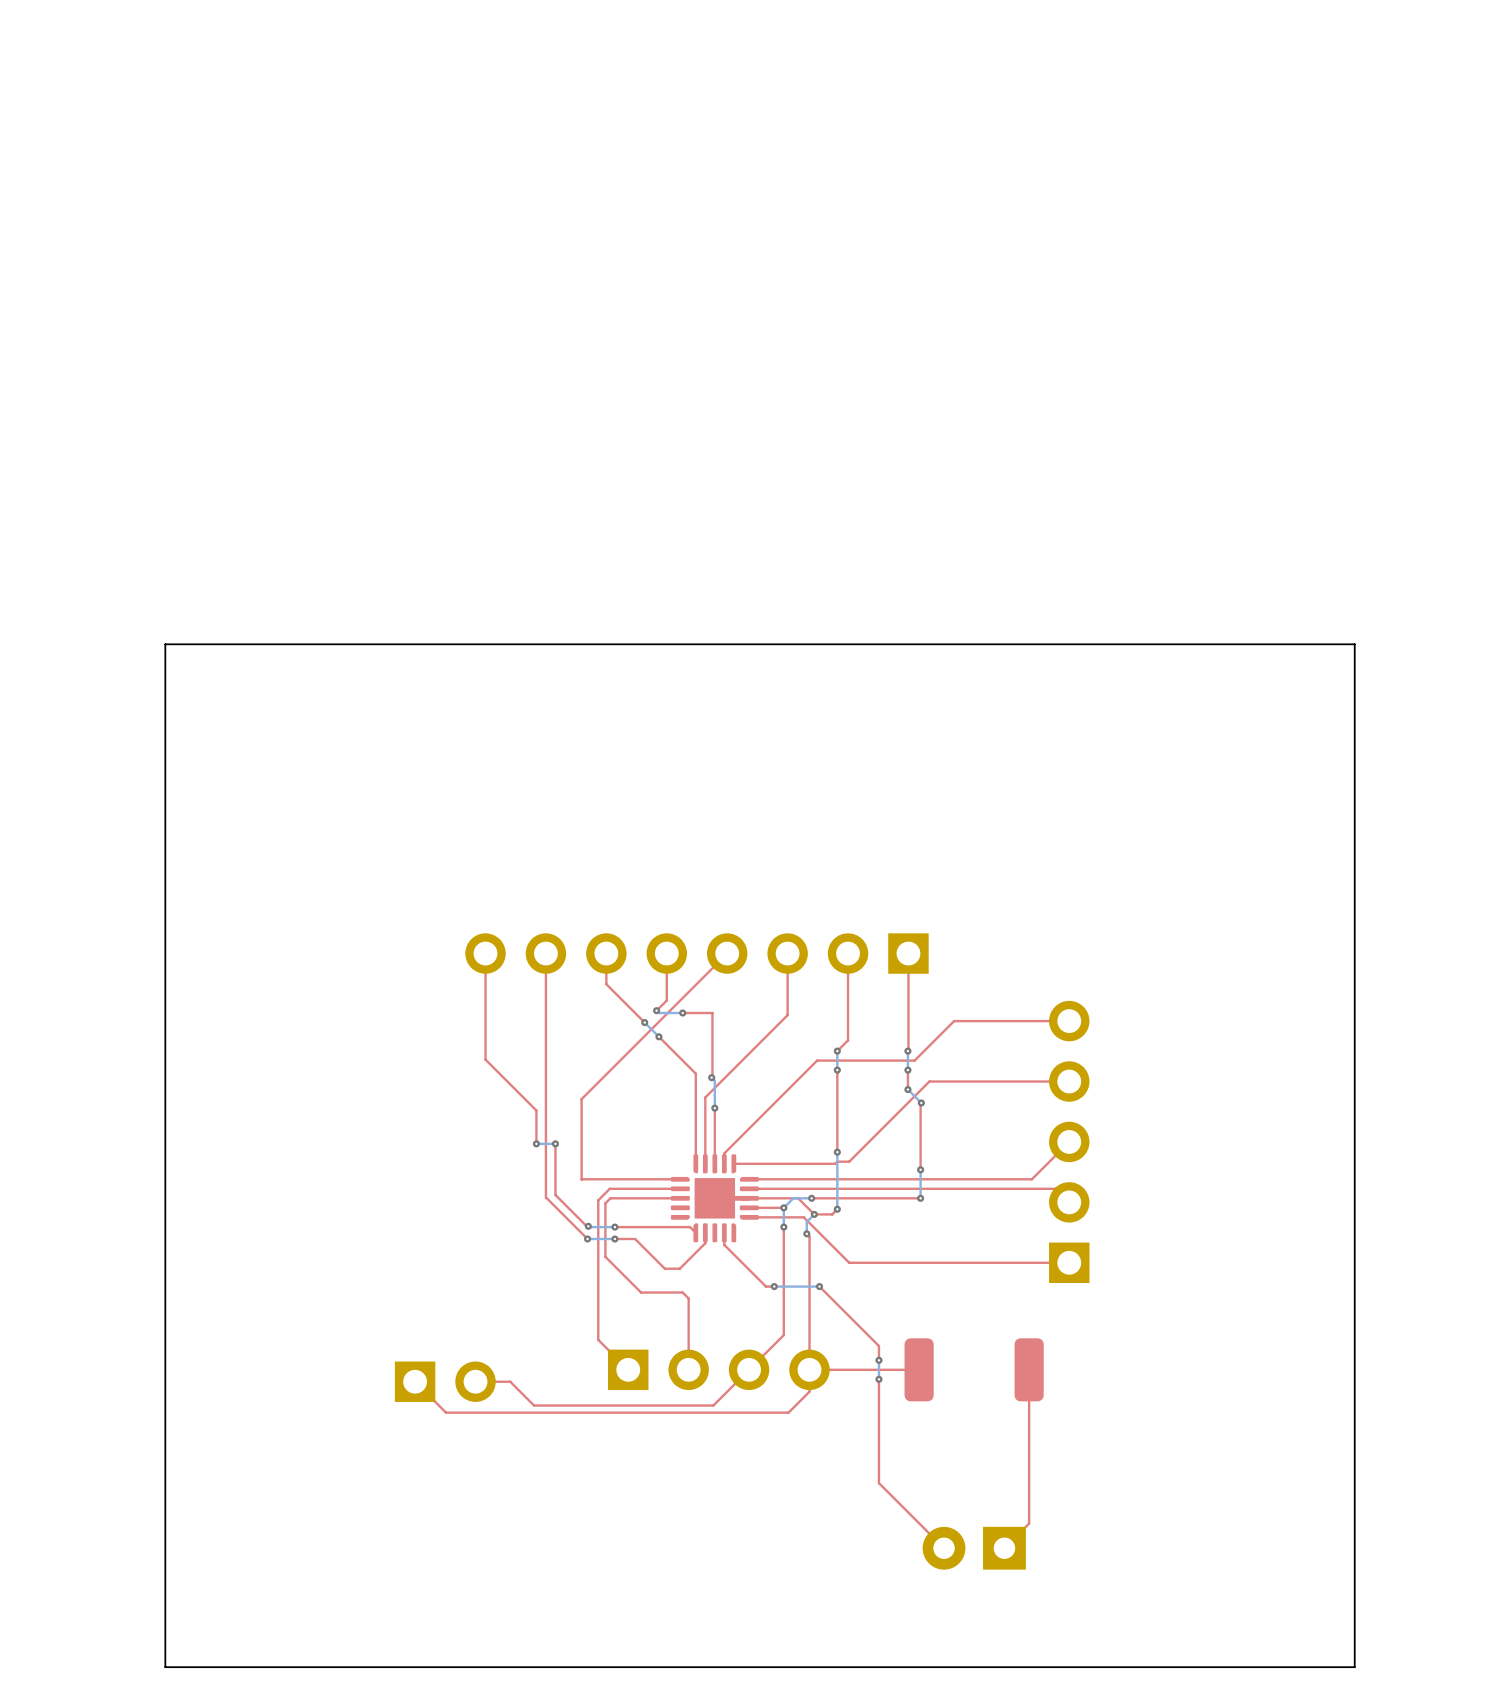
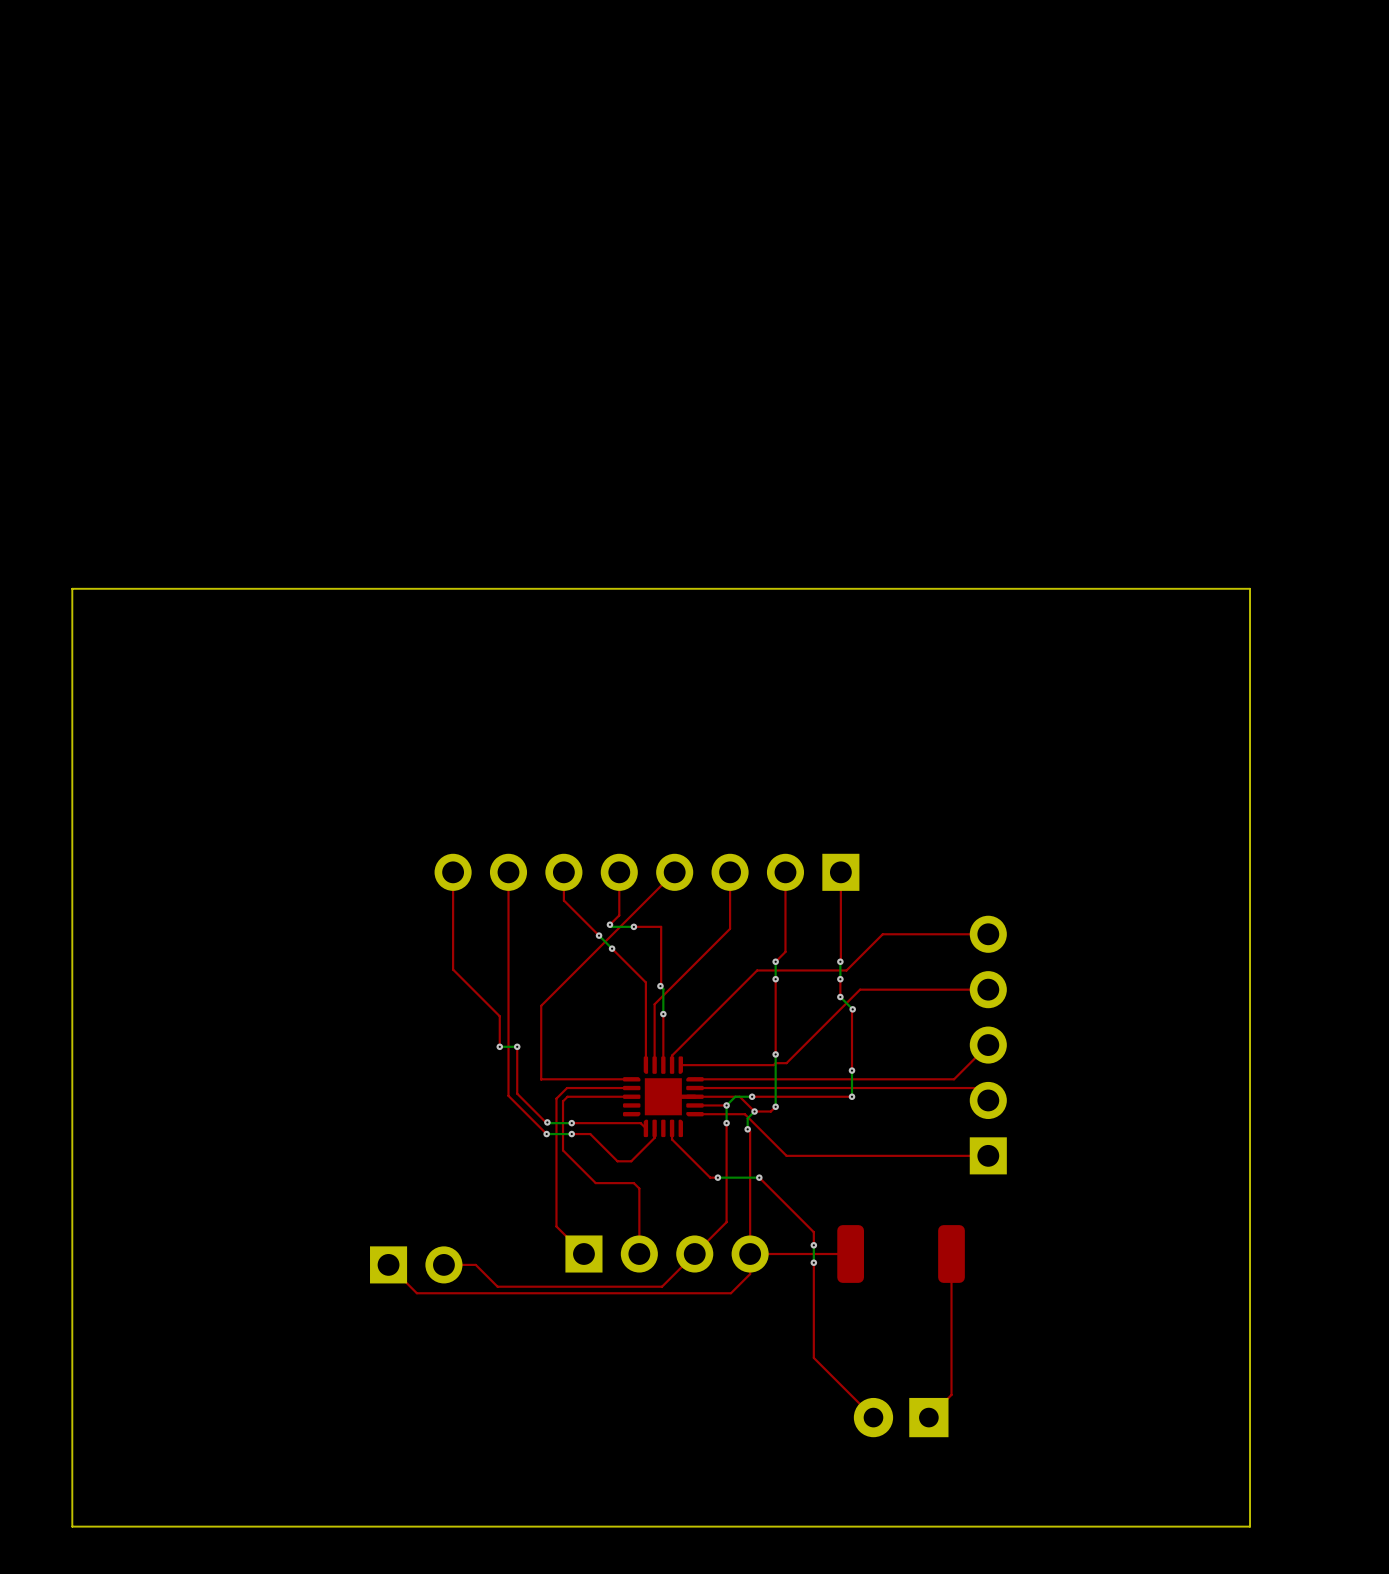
board edge: (165, 644) (165, 1667) -> (159, 588) (72, 588) (72, 1526) (159, 1526)

